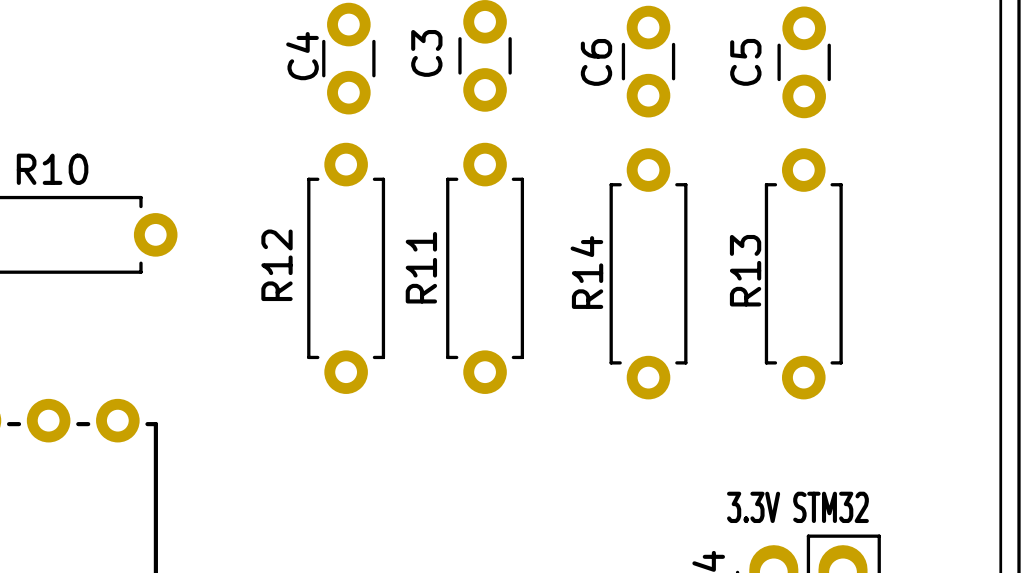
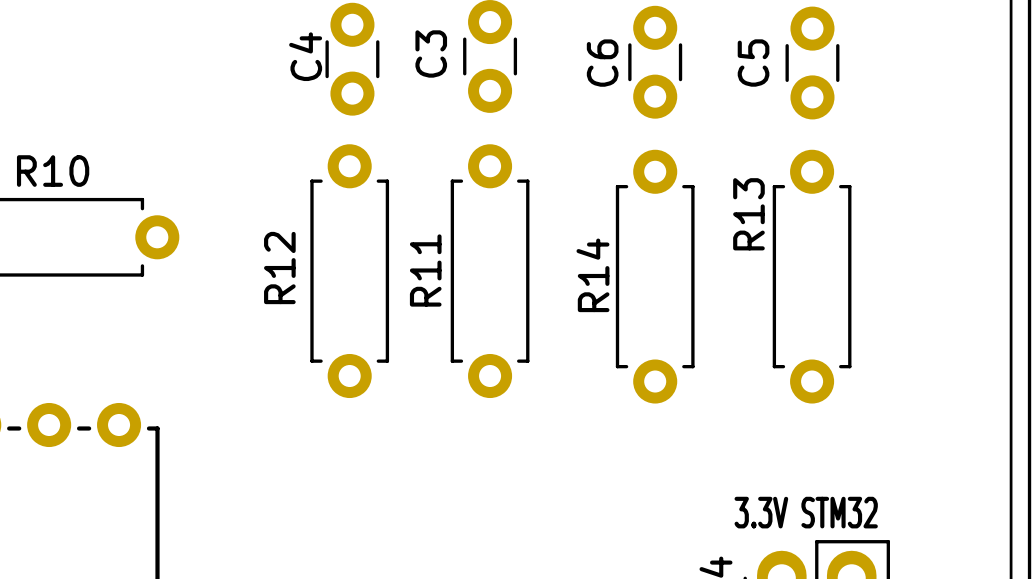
R13 name position: R13 (745, 270) -> R13 (748, 214)

